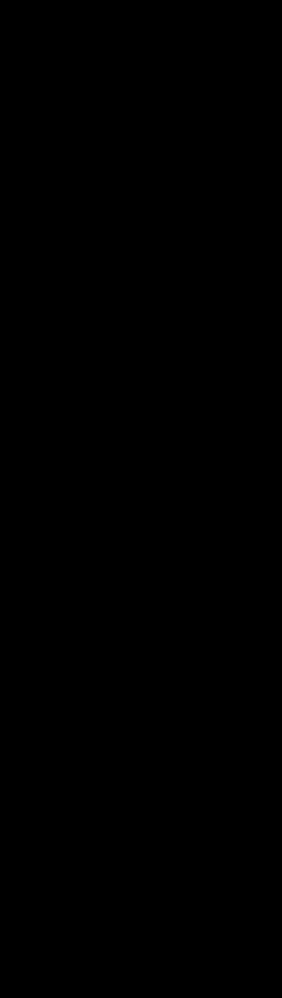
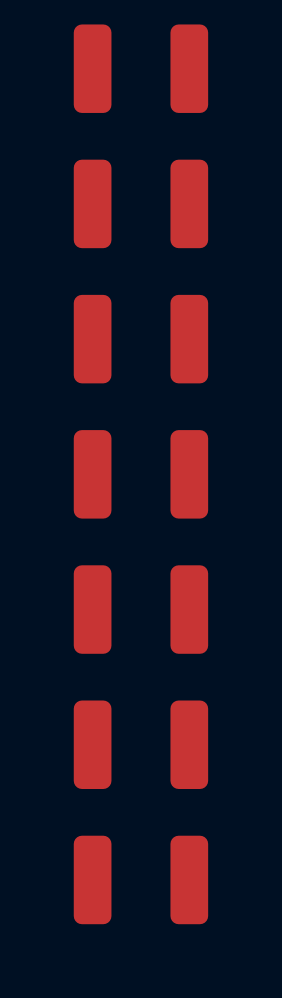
part: none -> (140, 68)
part: none -> (140, 203)
part: none -> (140, 339)
part: none -> (140, 474)
part: none -> (140, 609)
part: none -> (140, 744)
part: none -> (140, 879)

